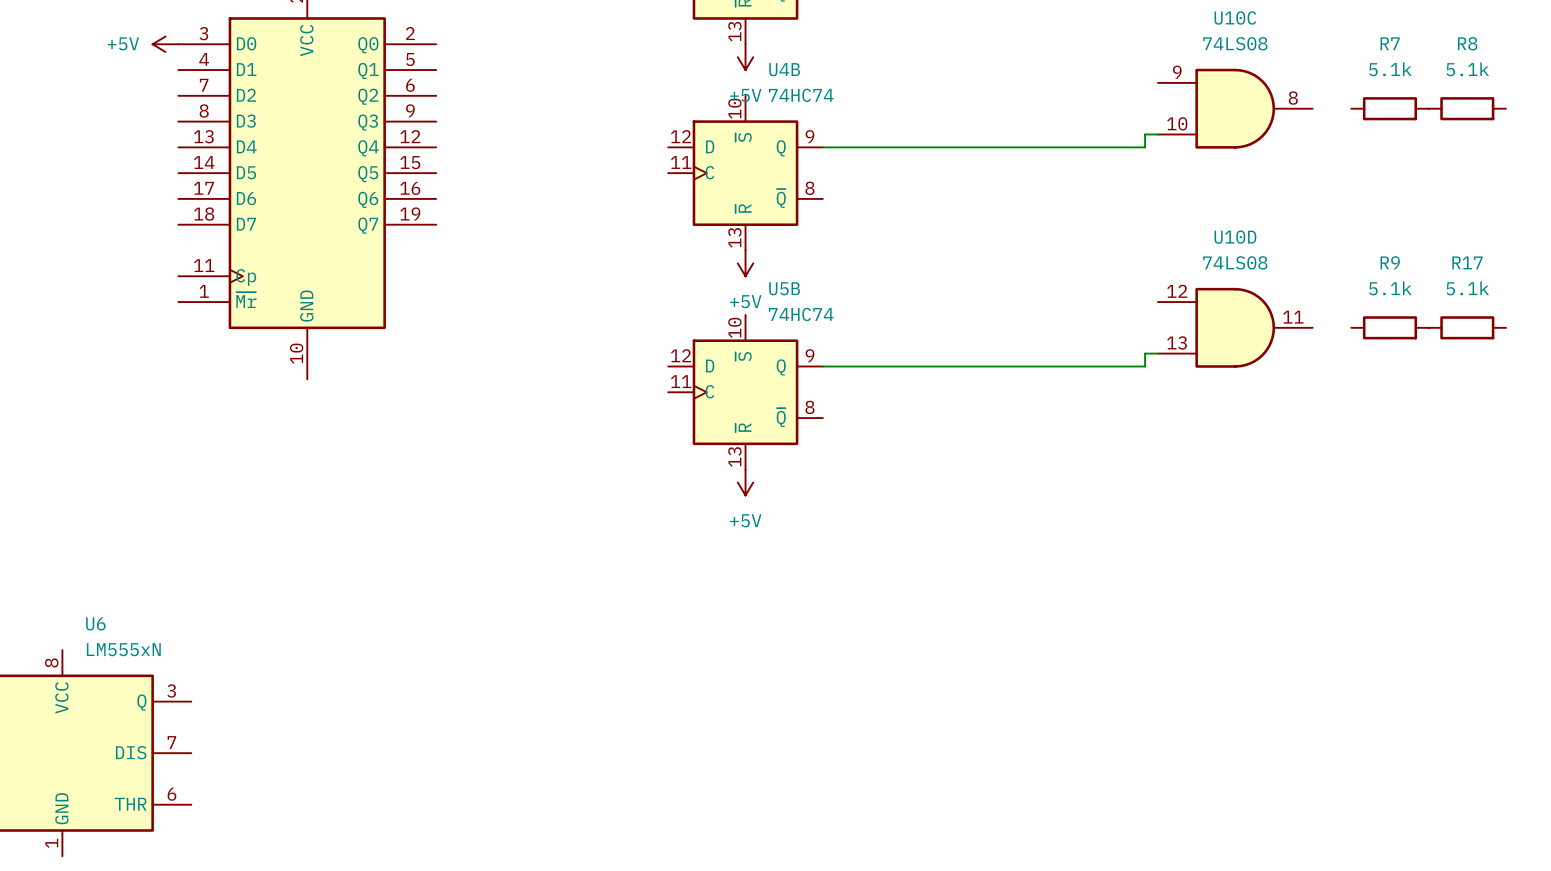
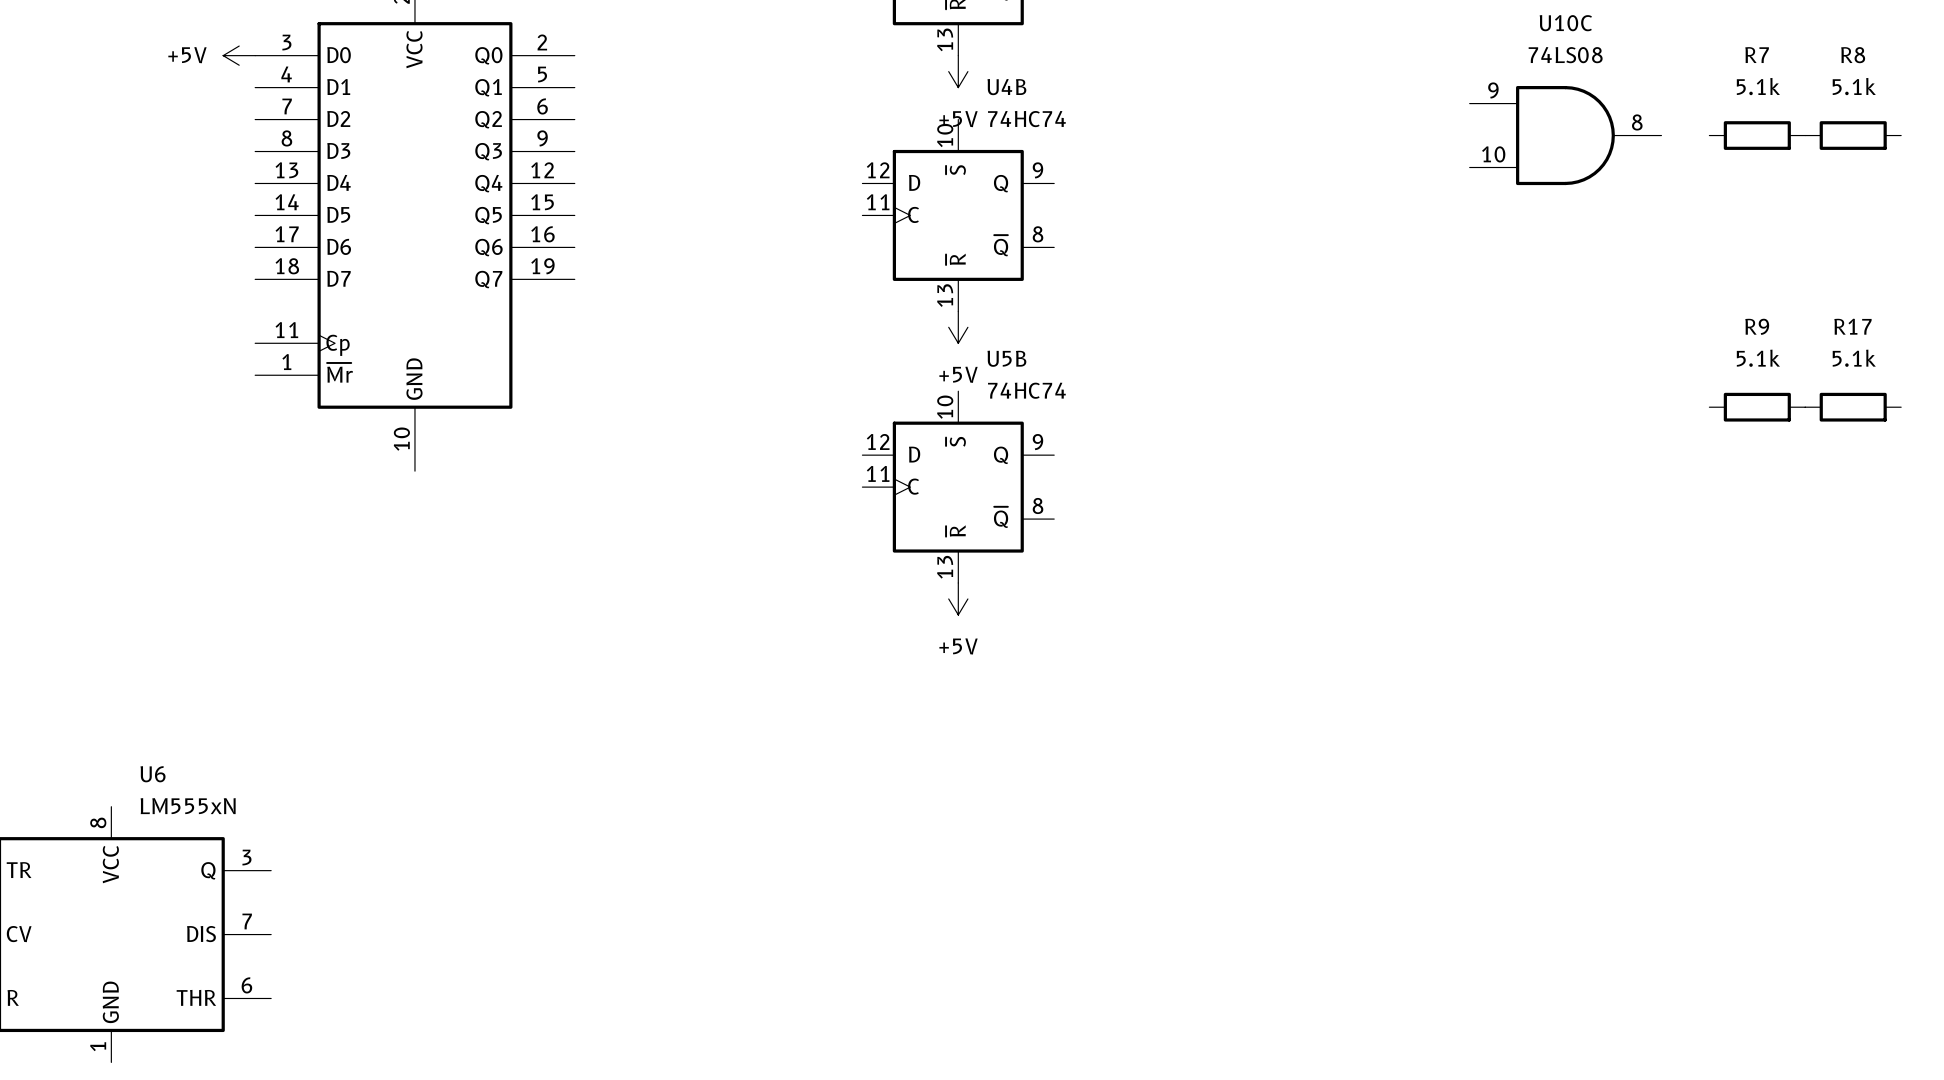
wire: (1157, 134) (1145, 134) (1145, 147) (822, 147) -> none
U10D: 74LS08 (1235, 327) -> none
wire: (1157, 353) (1145, 353) (1145, 366) (822, 366) -> none

